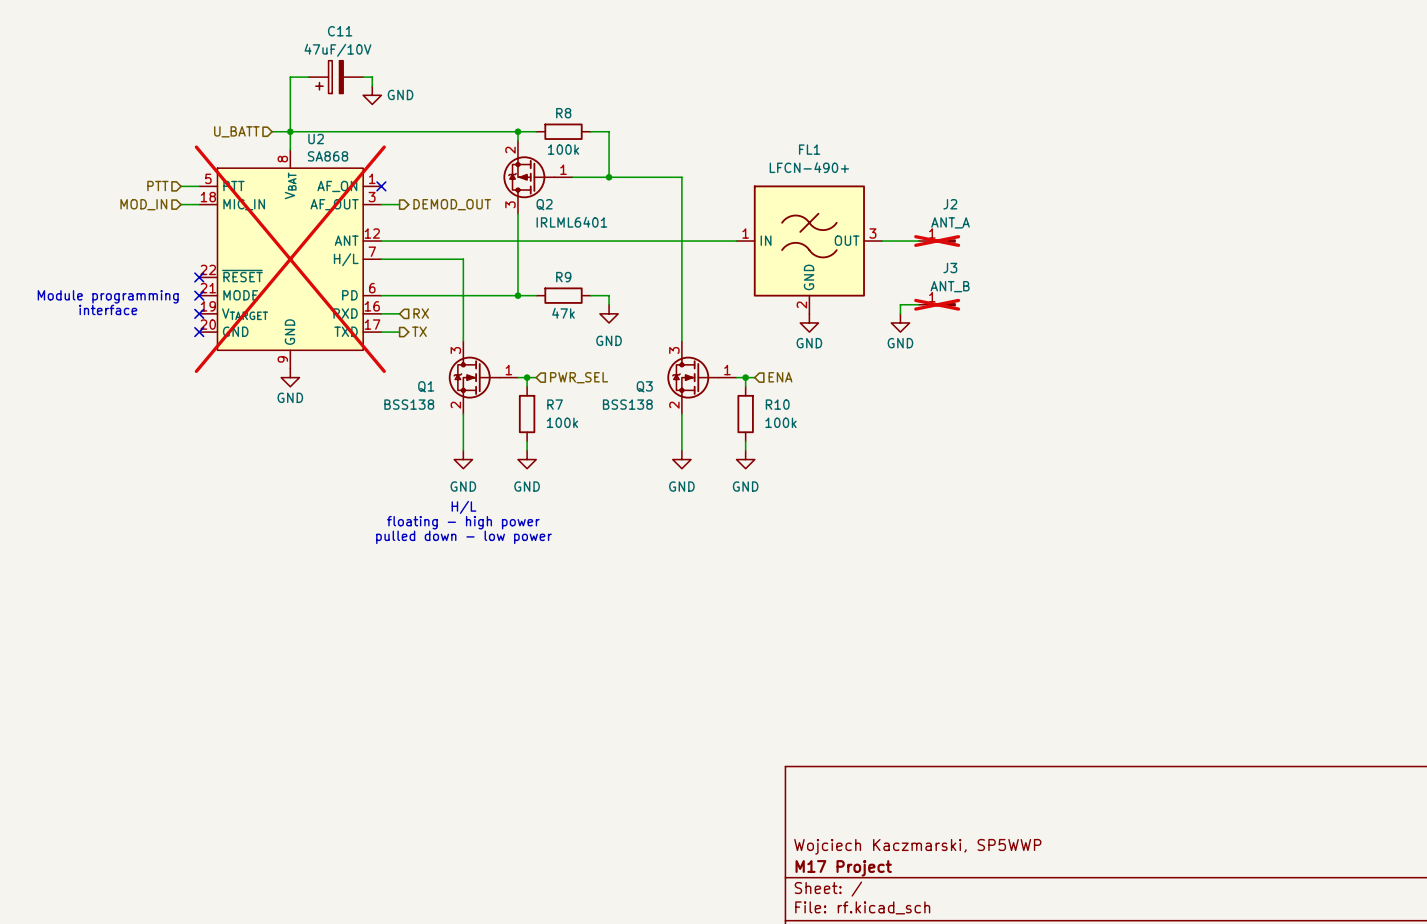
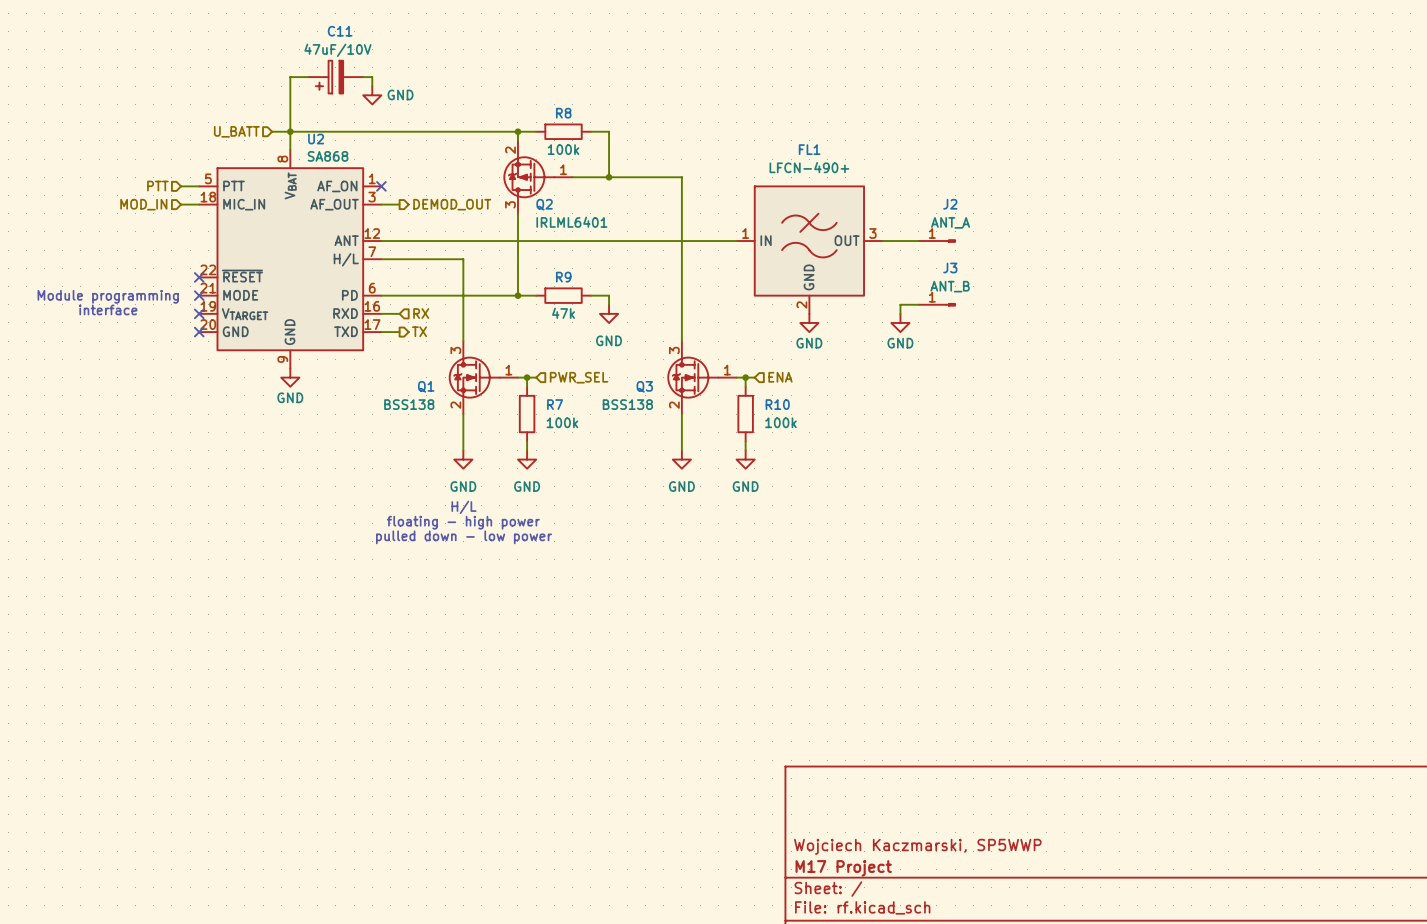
J2 do-not-place cross: (937, 241) -> none
U2 do-not-place cross: (290, 259) -> none
J3 do-not-place cross: (937, 304) -> none

